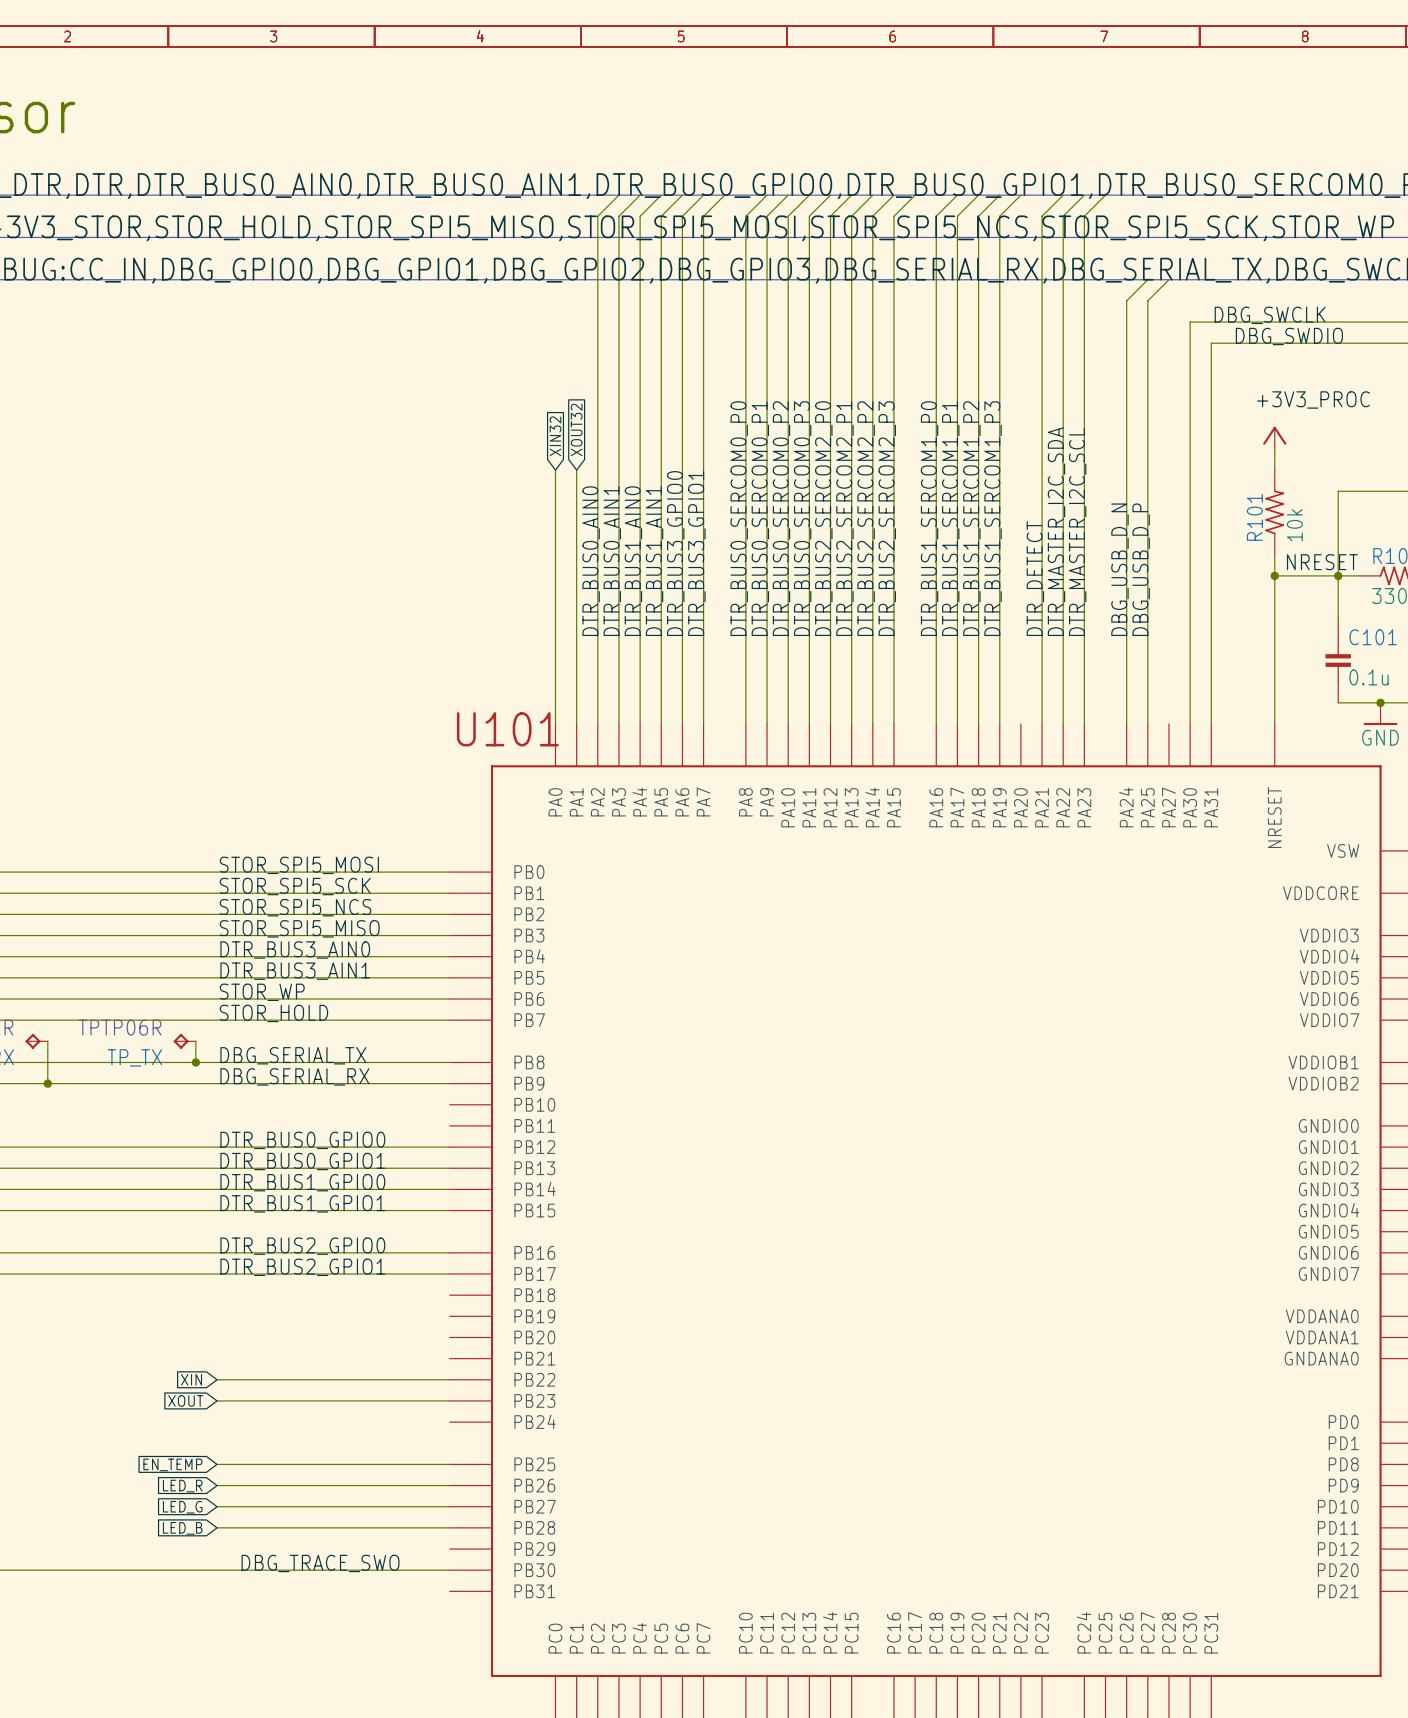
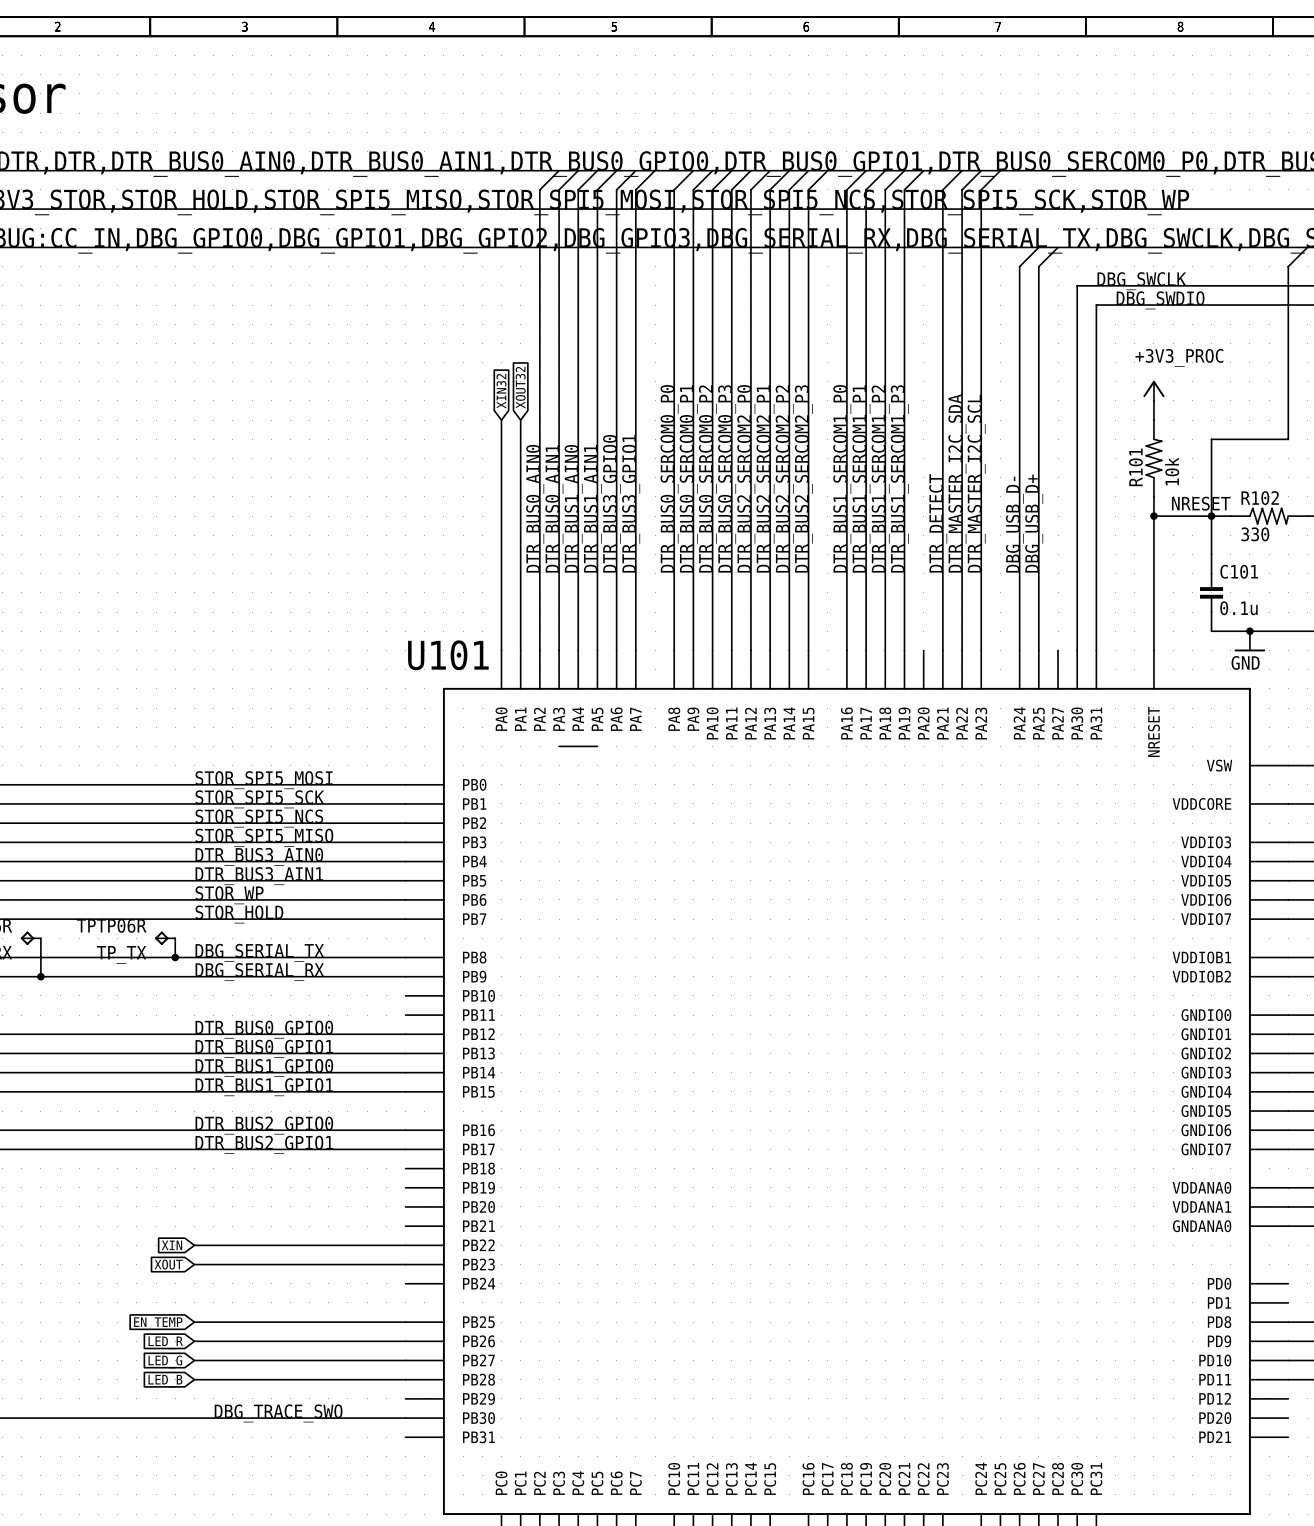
label: DBG_USB_D_N (1119, 569) -> DBG_USB_D- (1014, 524)
label: DBG_USB_D_P (1141, 569) -> DBG_USB_D+ (1034, 523)
wire: none -> (559, 746) (597, 746)

